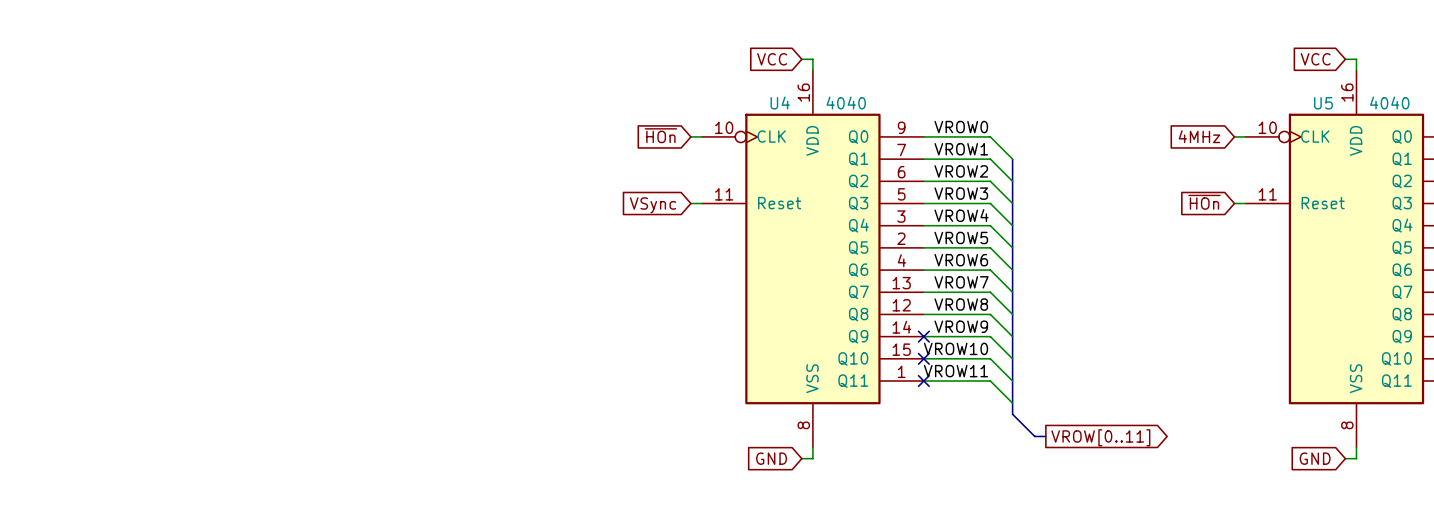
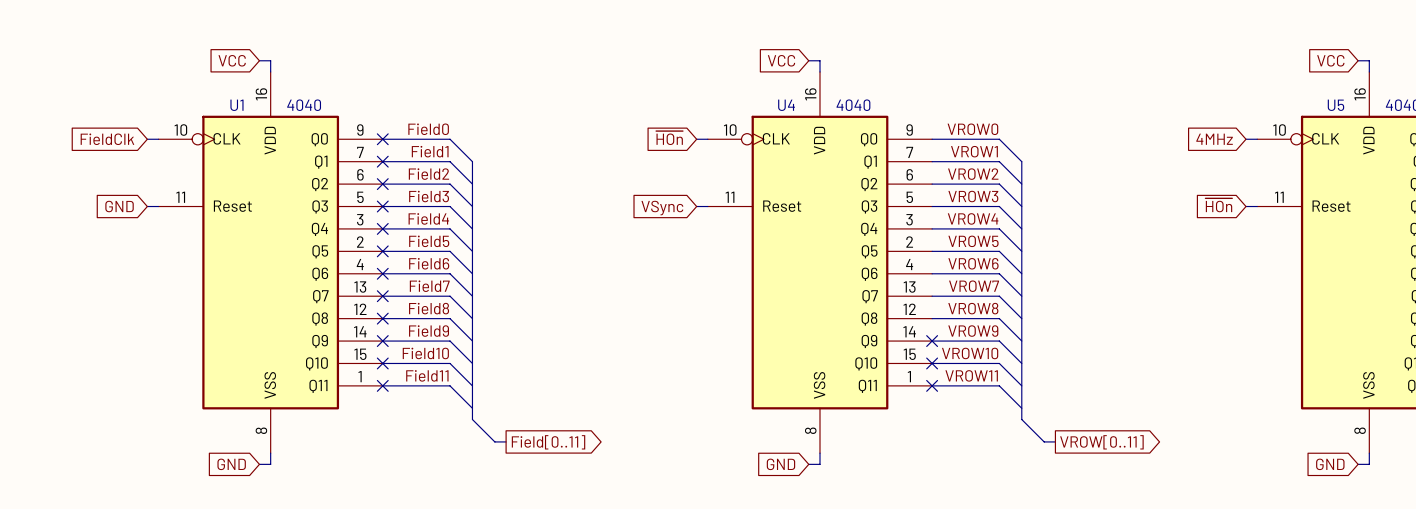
global label: none -> VCC (232, 60)
wire: none -> (259, 60) (270, 60) (270, 71)
label: none -> Field0 (428, 129)
global label: none -> FieldClk (107, 139)
wire: none -> (147, 139) (158, 139)
wire: none -> (382, 139) (450, 139) (472, 161)
no-connect mark: none -> (382, 139)
label: none -> Field1 (430, 151)
wire: none -> (382, 161) (450, 161) (472, 184)
no-connect mark: none -> (382, 161)
bus: none -> (472, 161) (472, 419) (494, 441) (506, 441)
label: none -> Field2 (428, 174)
wire: none -> (382, 184) (450, 184) (472, 206)
no-connect mark: none -> (382, 184)
label: none -> Field3 (429, 196)
global label: none -> GND (119, 206)
wire: none -> (147, 206) (158, 206)
wire: none -> (382, 206) (450, 206) (472, 228)
no-connect mark: none -> (382, 206)
label: none -> Field4 (428, 218)
wire: none -> (382, 228) (450, 228) (472, 251)
no-connect mark: none -> (382, 228)
label: none -> Field5 (429, 241)
wire: none -> (382, 251) (450, 251) (472, 273)
no-connect mark: none -> (382, 251)
U1: none -> 4040 (270, 262)
label: none -> Field6 (429, 263)
wire: none -> (382, 273) (450, 273) (472, 296)
no-connect mark: none -> (382, 273)
label: none -> Field7 (429, 286)
wire: none -> (382, 296) (450, 296) (472, 318)
no-connect mark: none -> (382, 296)
label: none -> Field8 (429, 308)
wire: none -> (382, 318) (450, 318) (472, 341)
no-connect mark: none -> (382, 318)
label: none -> Field9 (429, 331)
wire: none -> (382, 341) (450, 341) (472, 363)
no-connect mark: none -> (382, 341)
label: none -> Field10 (425, 353)
wire: none -> (382, 363) (450, 363) (472, 385)
no-connect mark: none -> (382, 363)
label: none -> Field11 (427, 375)
wire: none -> (382, 385) (450, 385) (472, 408)
no-connect mark: none -> (382, 385)
global label: none -> Field[0..11] (548, 442)
wire: none -> (270, 453) (270, 464) (259, 464)
global label: none -> GND (231, 464)

